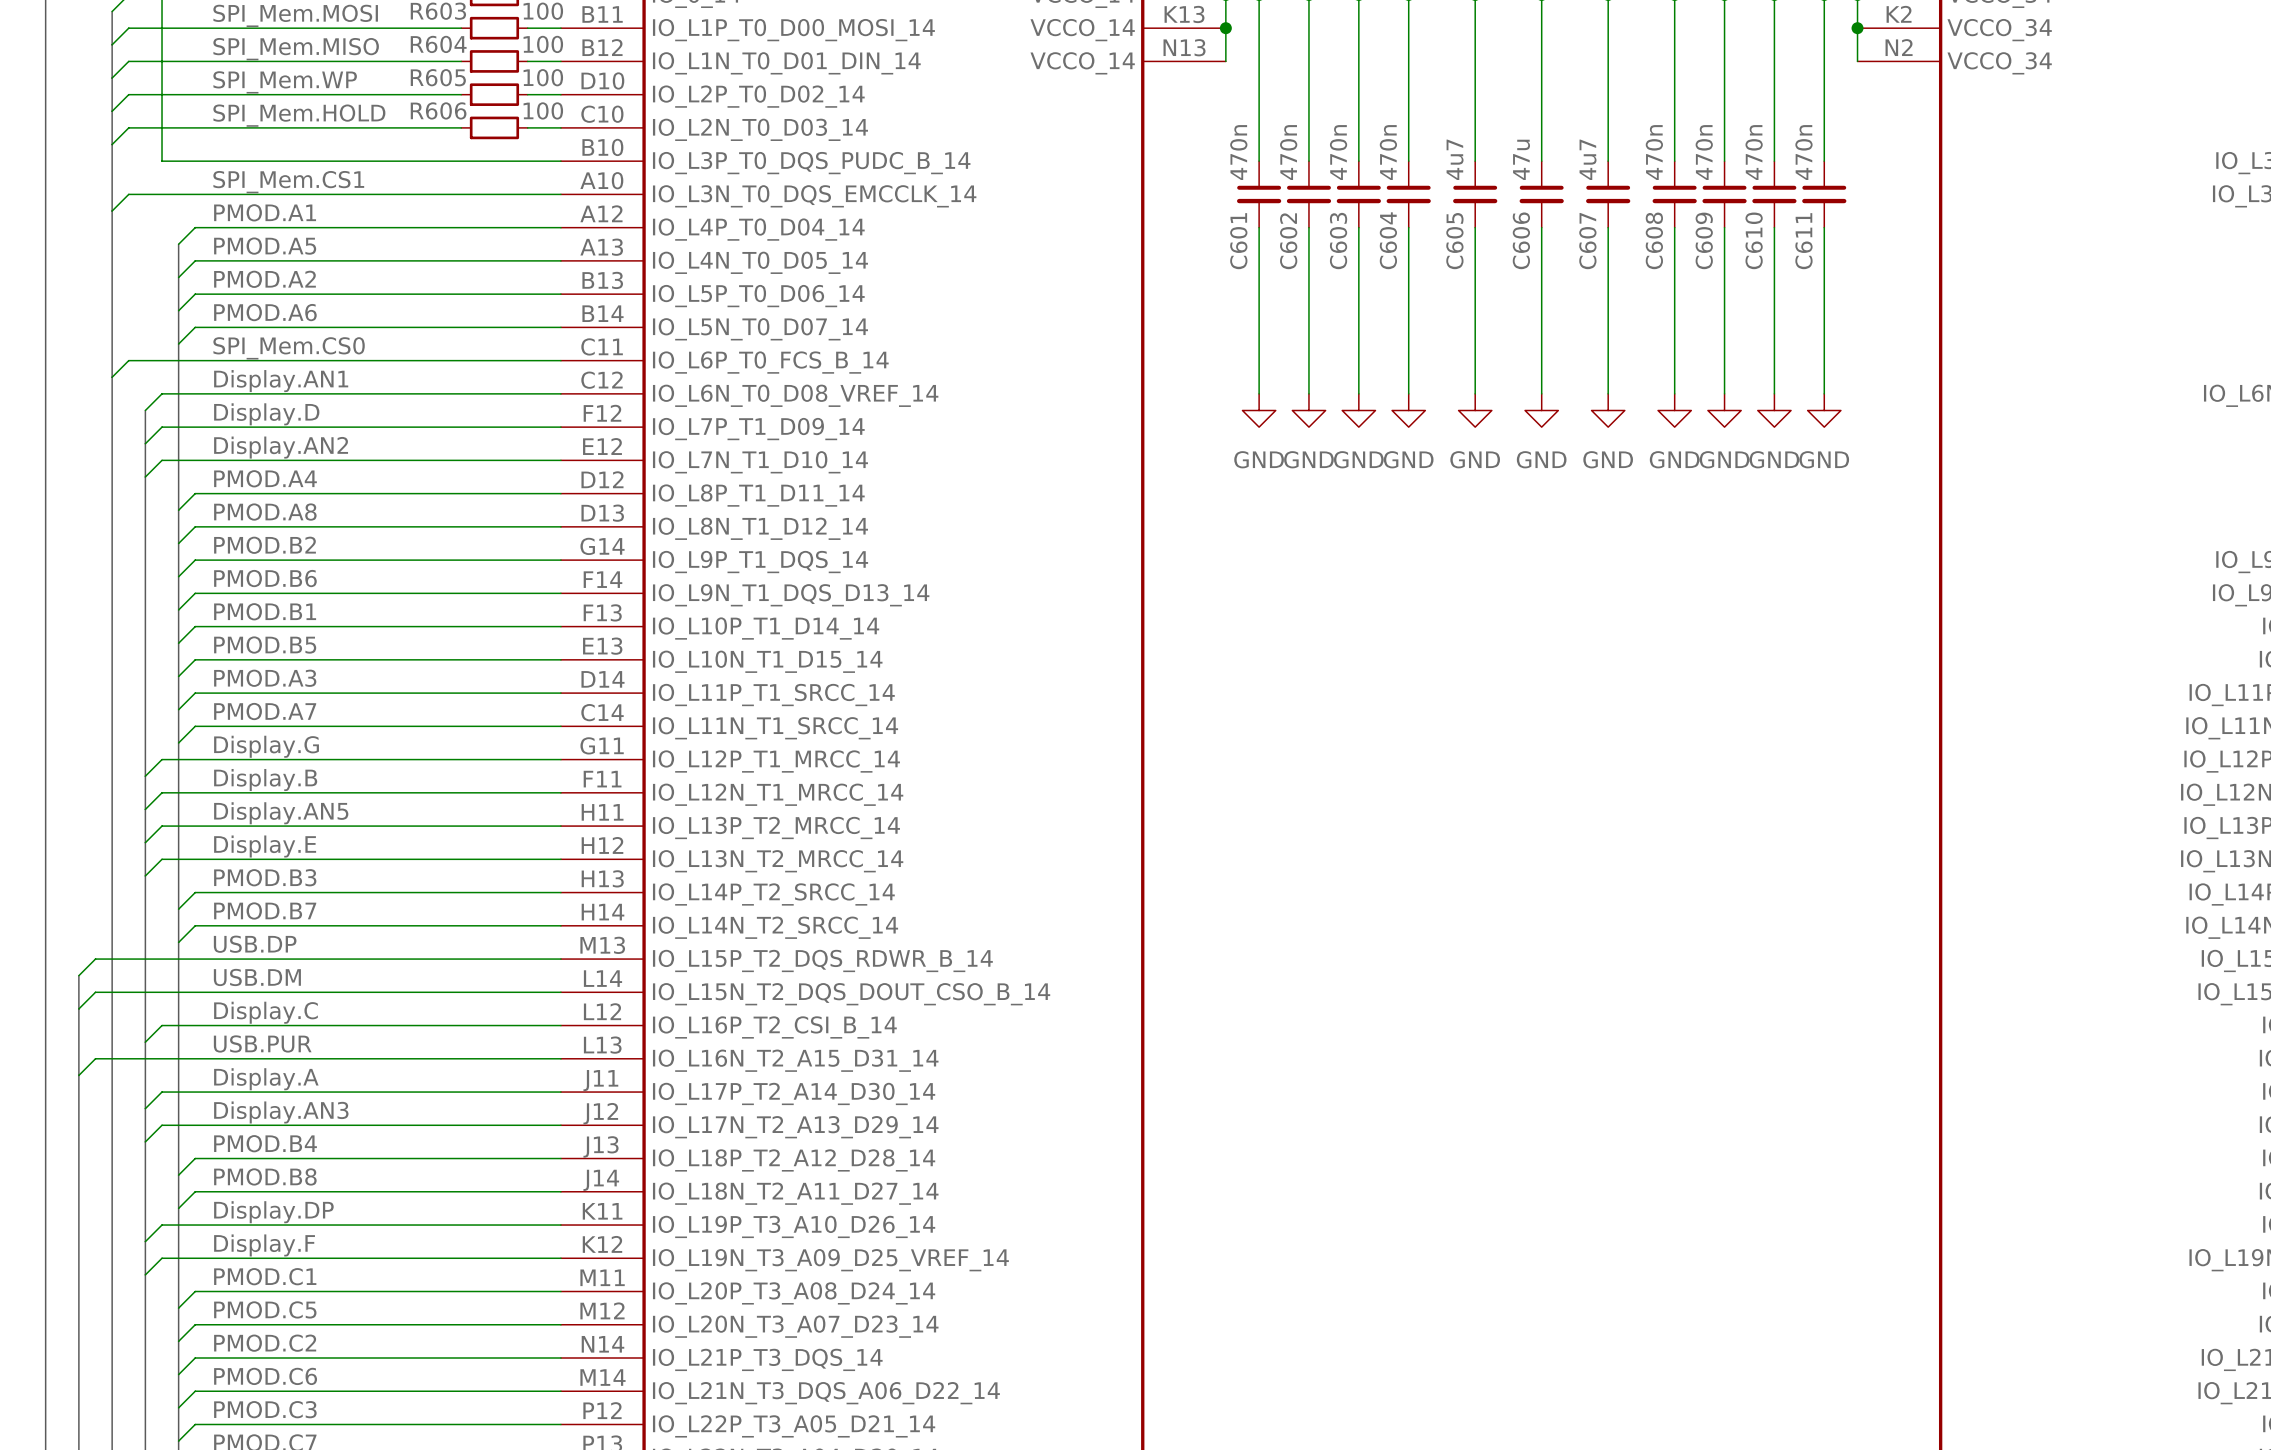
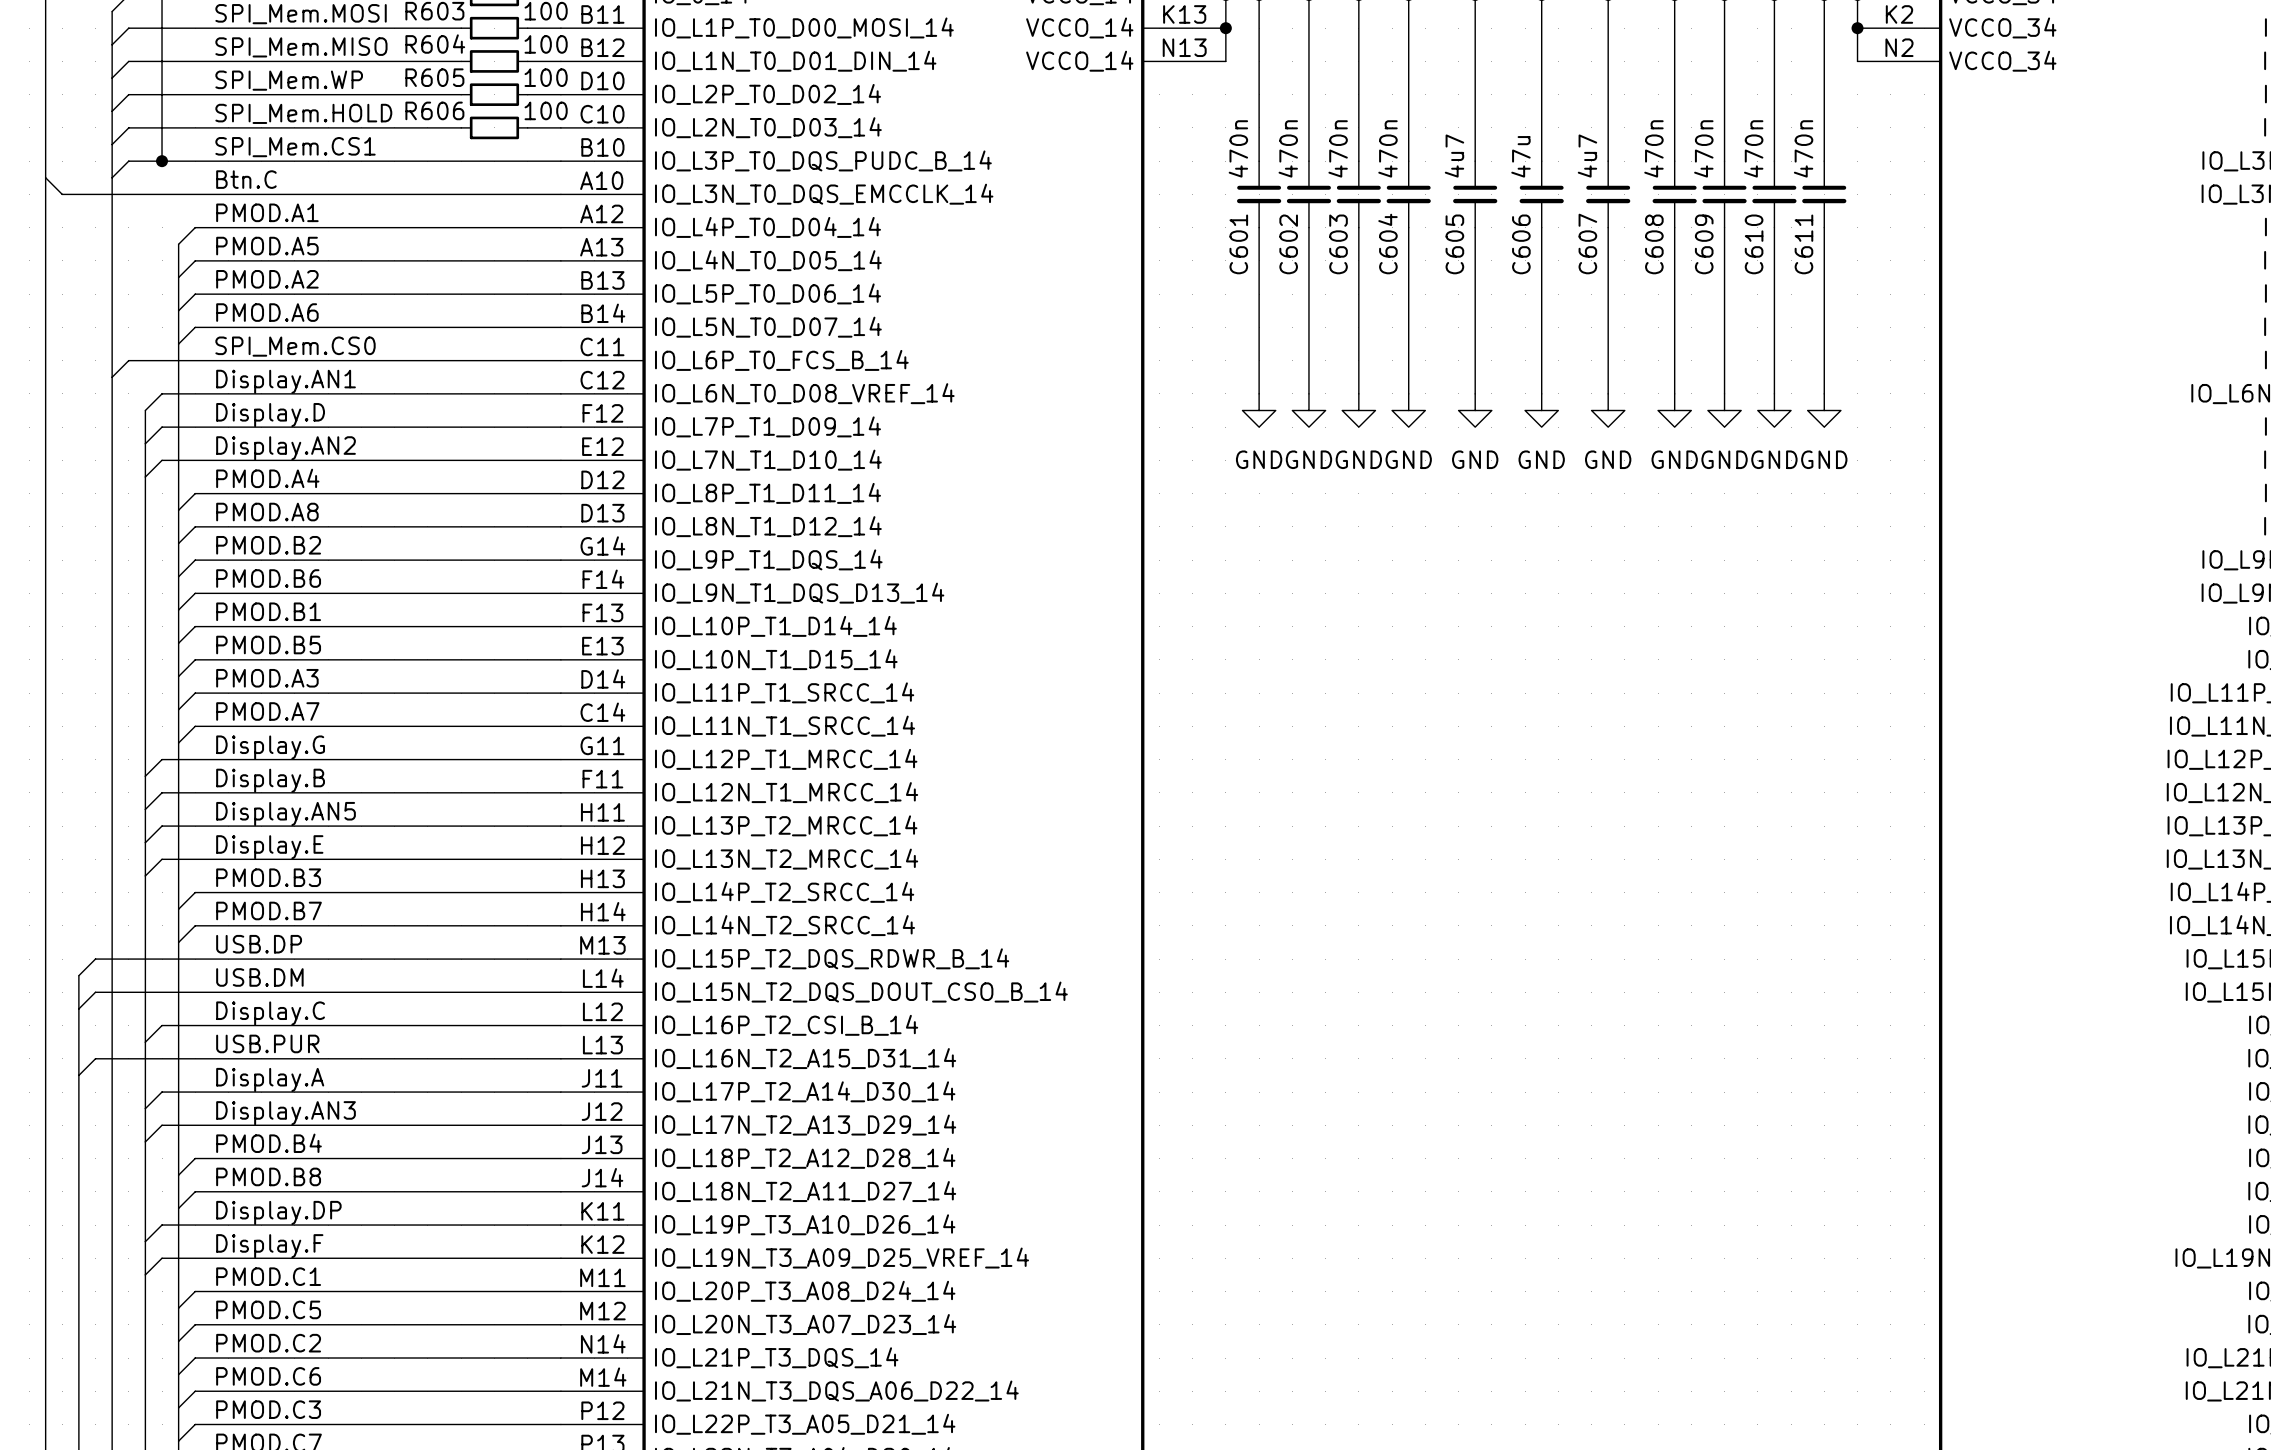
label: none -> SPI_Mem.CS1 (295, 147)
wire: none -> (162, 161) (128, 161) (112, 177)
junction: none -> (162, 161)
label: SPI_Mem.CS1 (288, 182) -> Btn.C (246, 179)
wire: (128, 194) (112, 211) -> (128, 194) (62, 194) (45, 177)

